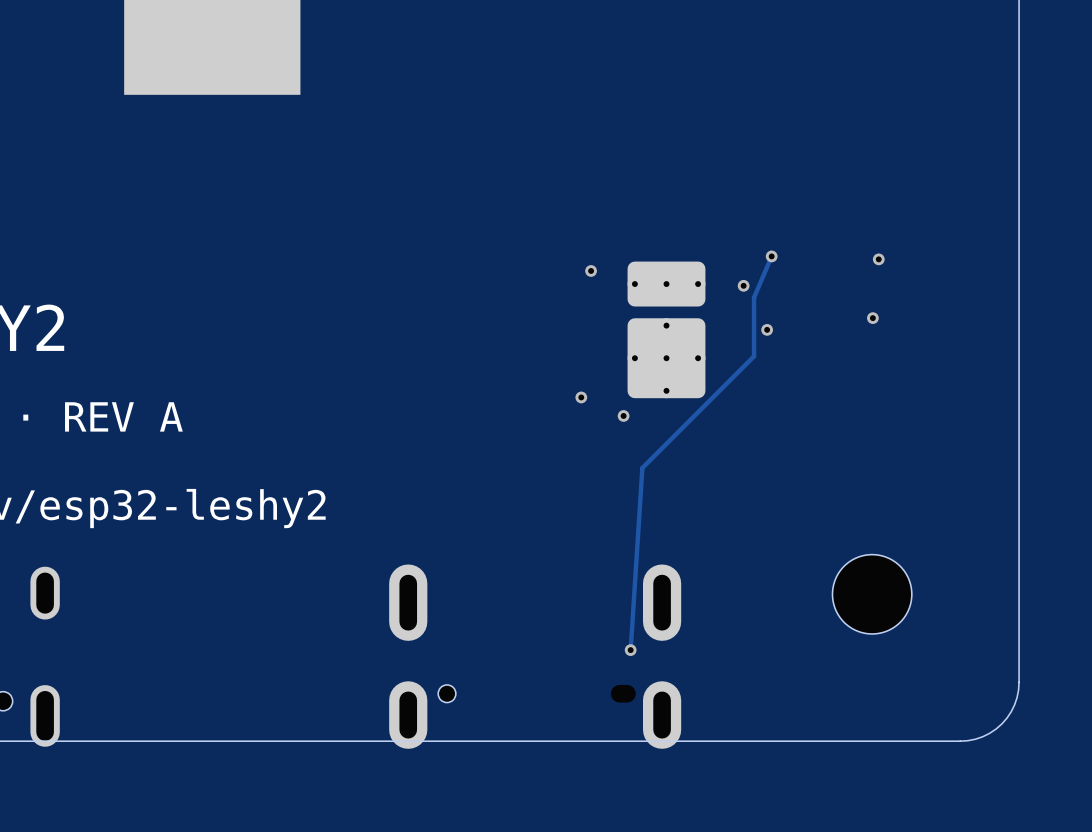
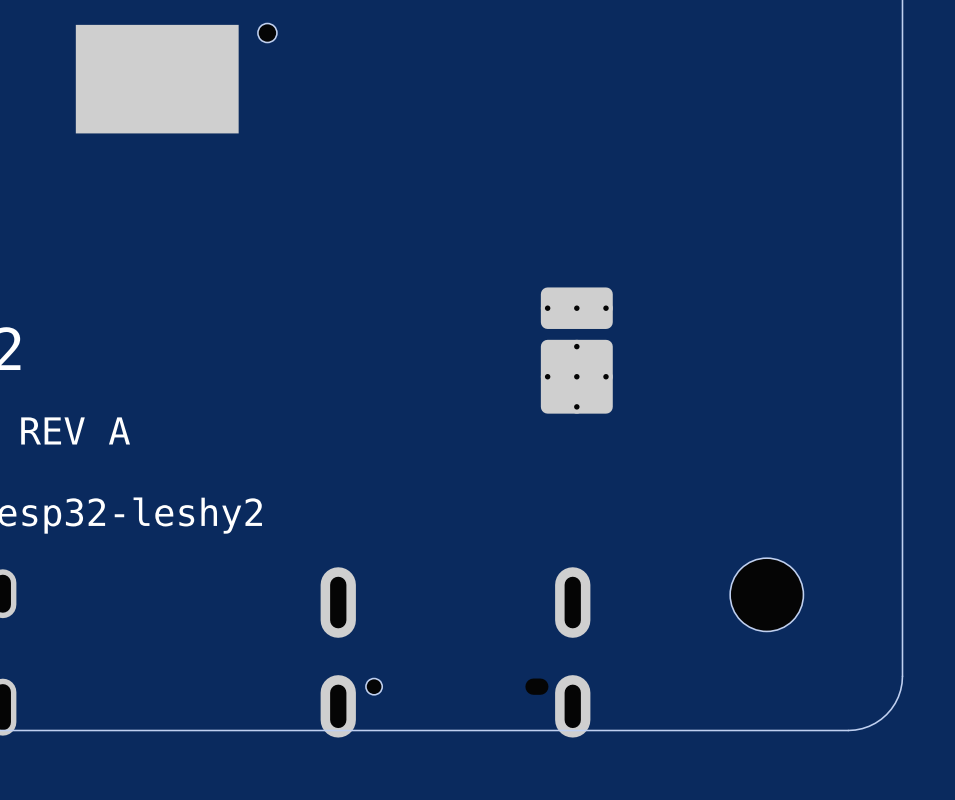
track: (771, 256) (754, 297) (754, 356) (642, 467) (630, 650) -> none
via: (771, 256) -> none
via: (878, 259) -> none
via: (591, 270) -> none
via: (743, 285) -> none
via: (872, 318) -> none
via: (767, 329) -> none
via: (581, 397) -> none
via: (623, 415) -> none
via: (630, 650) -> none

